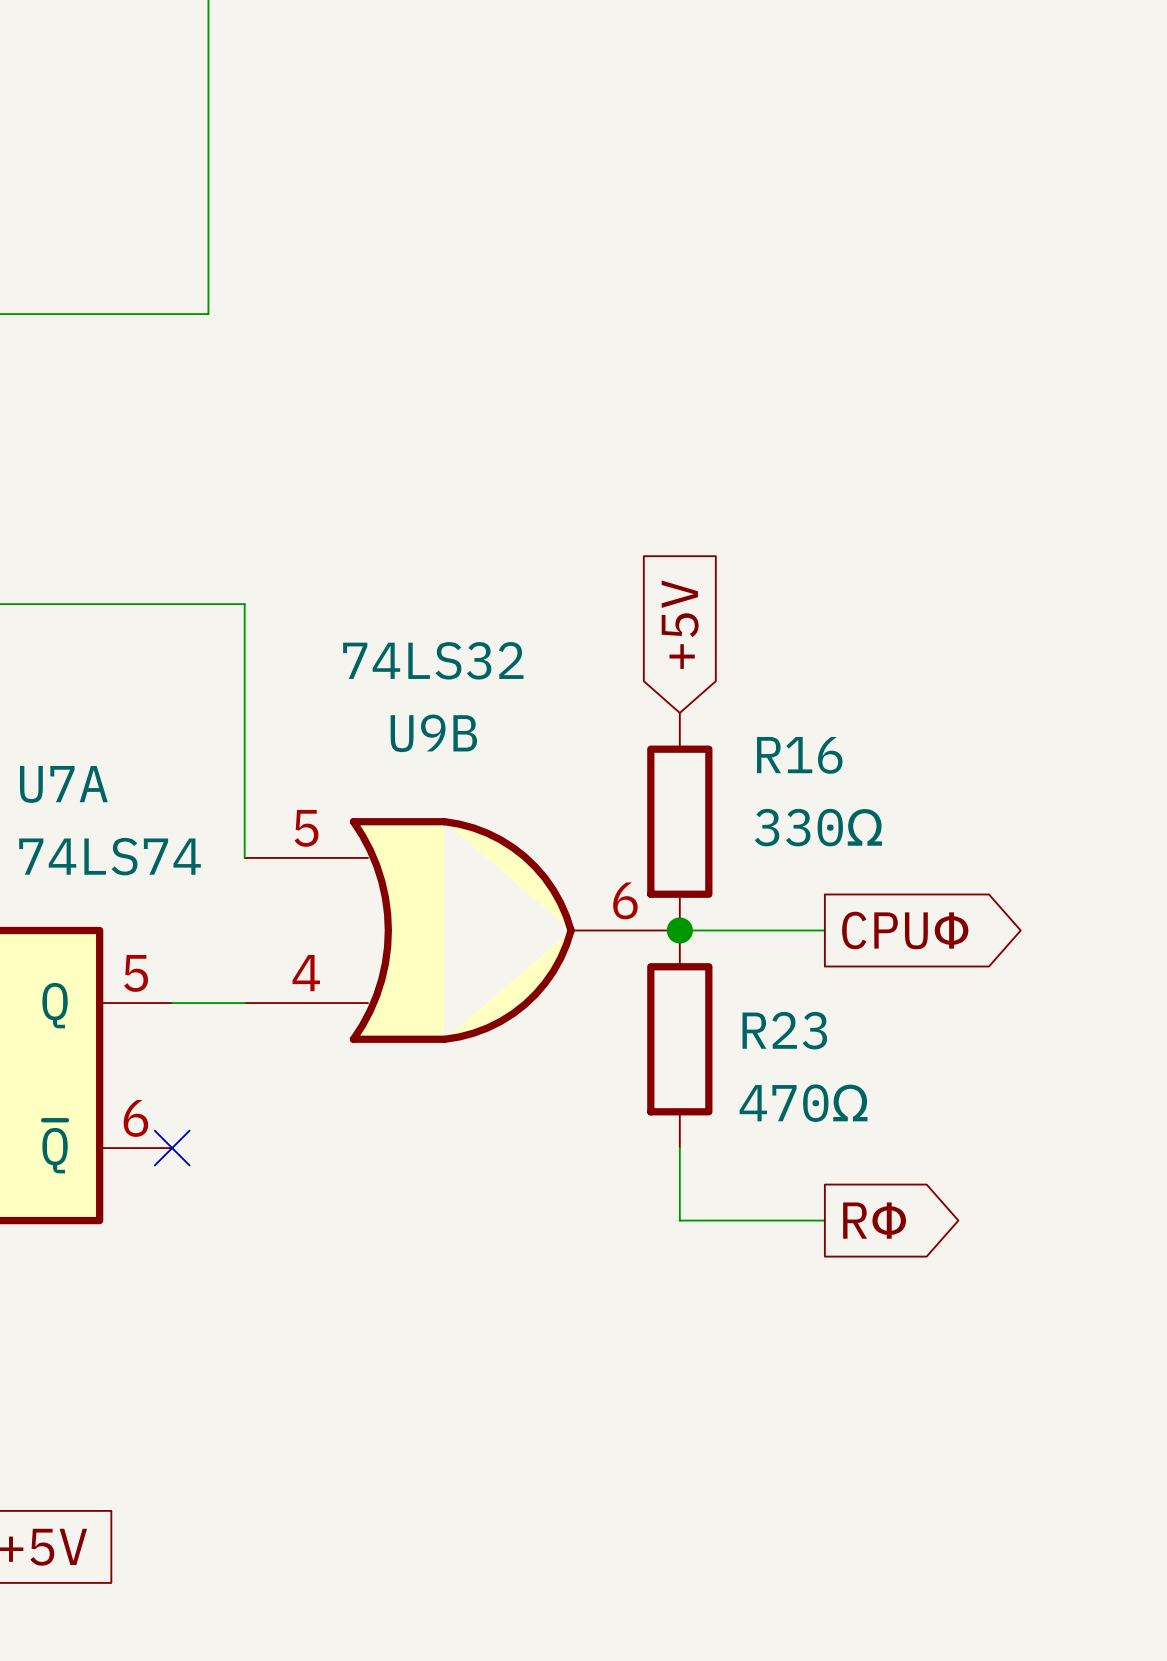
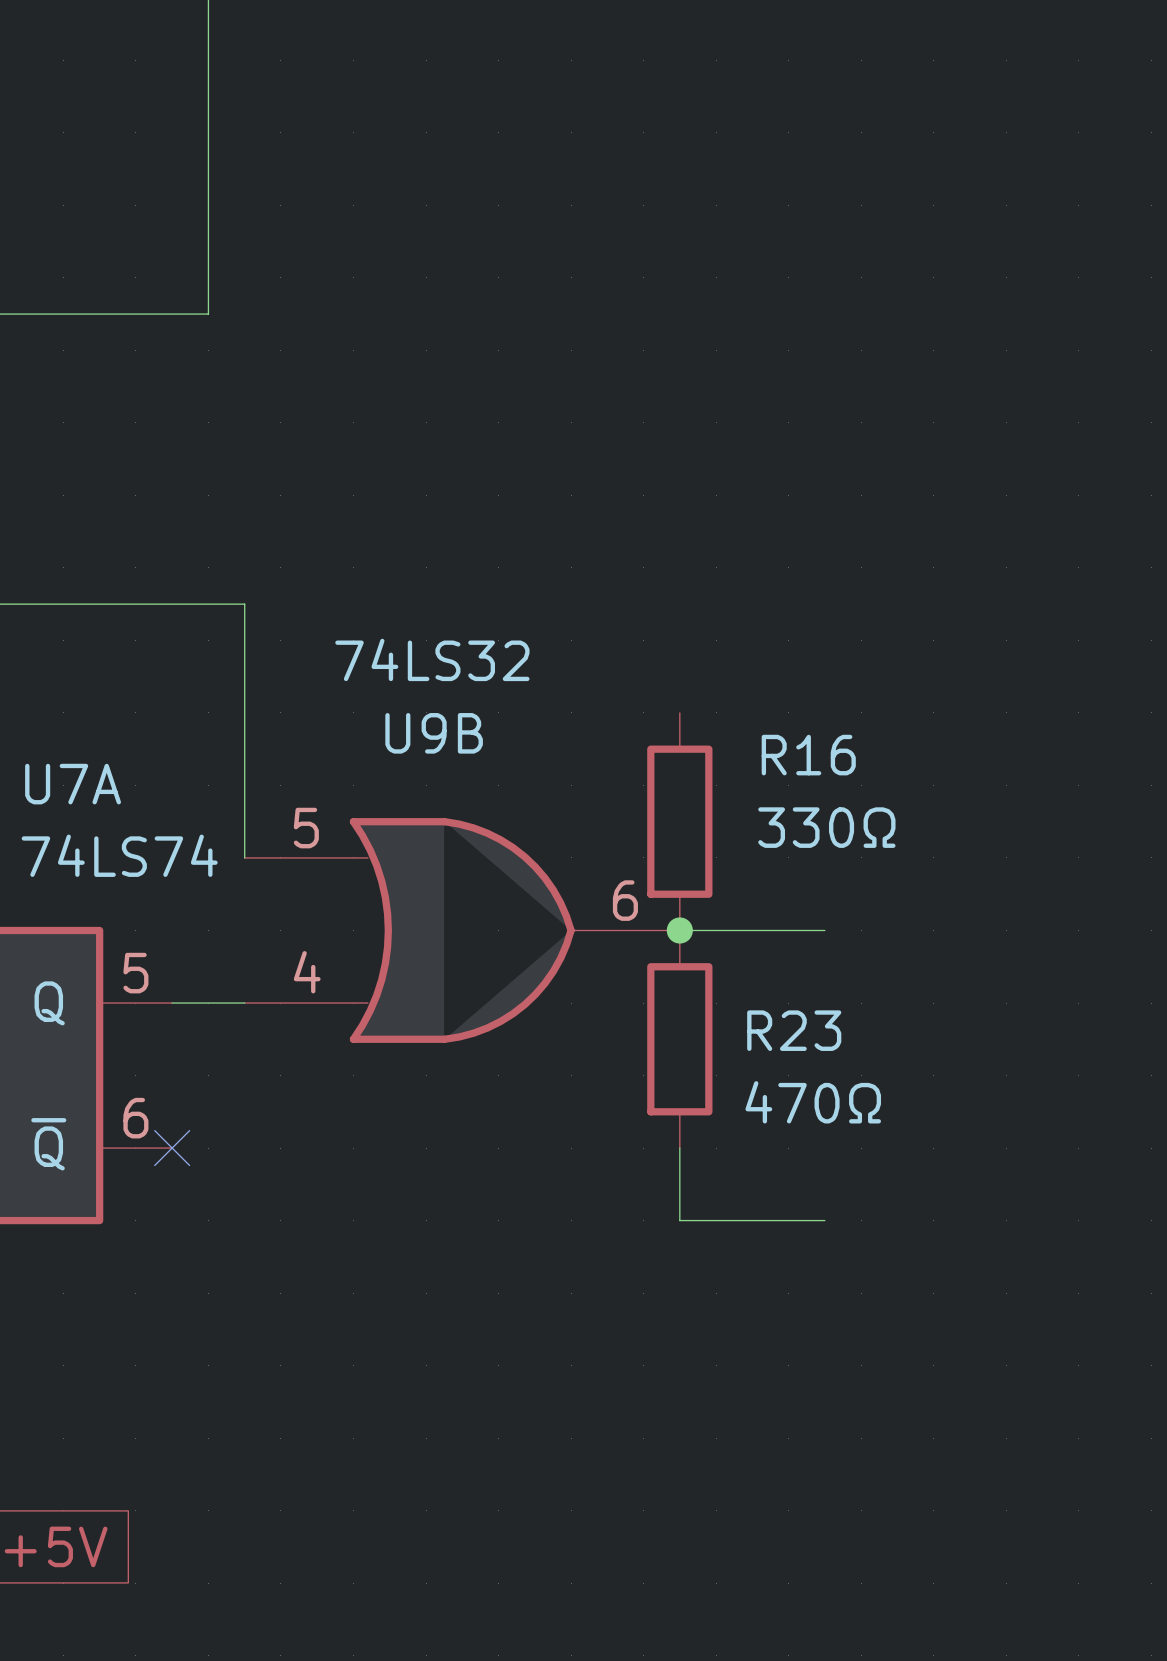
global label: +5V (680, 624) -> none
global label: CPUΦ (905, 930) -> none
global label: RΦ (874, 1220) -> none

